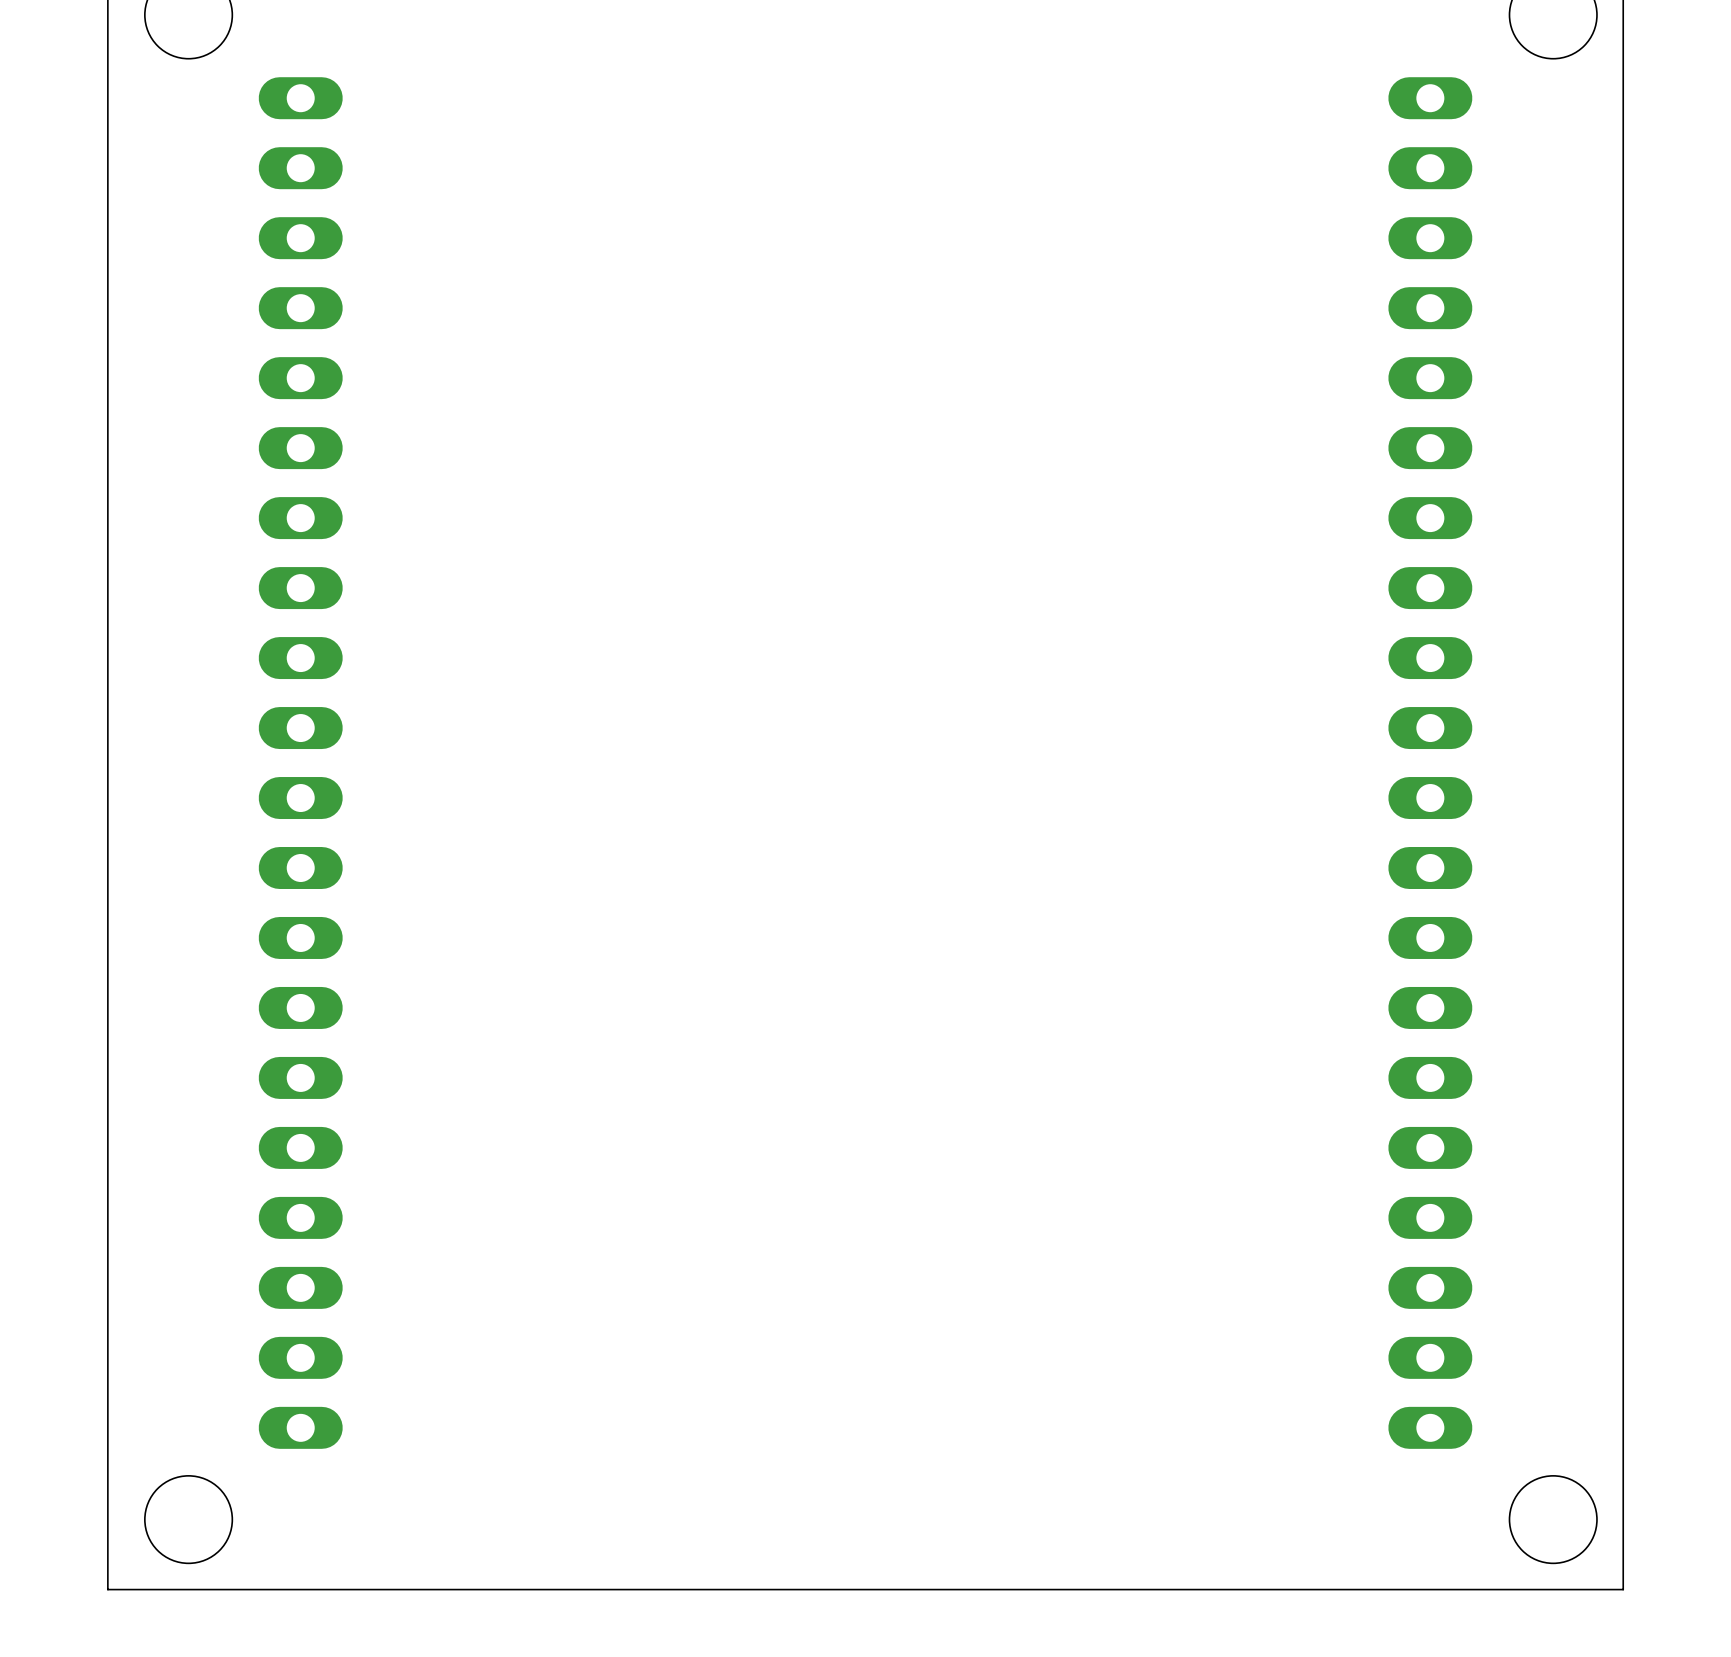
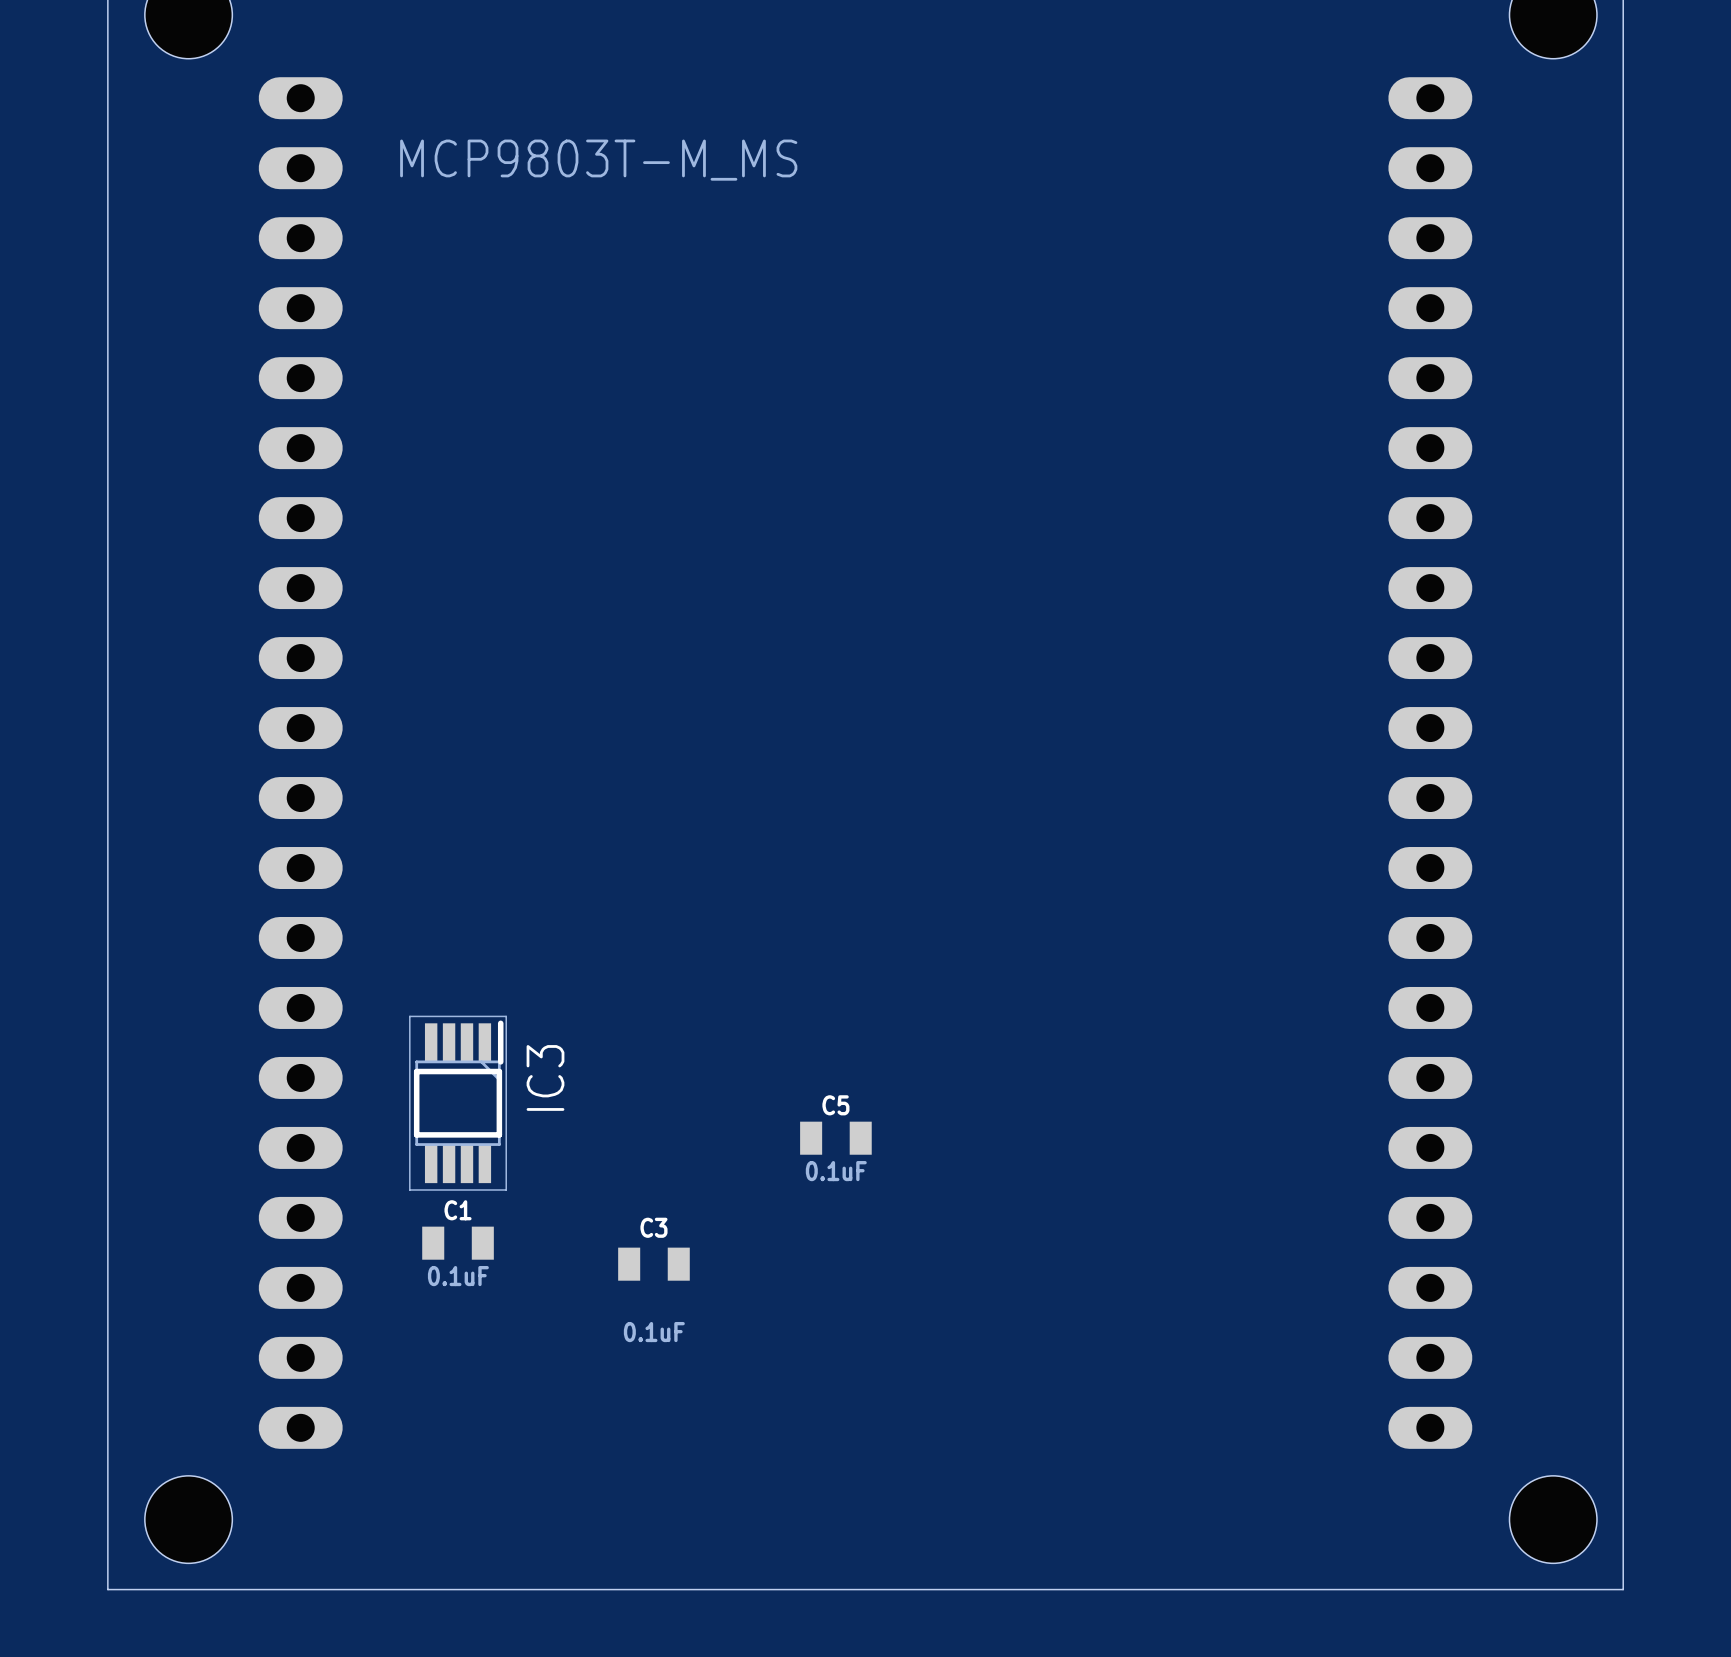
IC3: none -> MCP9803T-M_MS (458, 1103)
C5: none -> 0.1uF (835, 1138)
C1: none -> 0.1uF (458, 1243)
C3: none -> 0.1uF (653, 1264)

